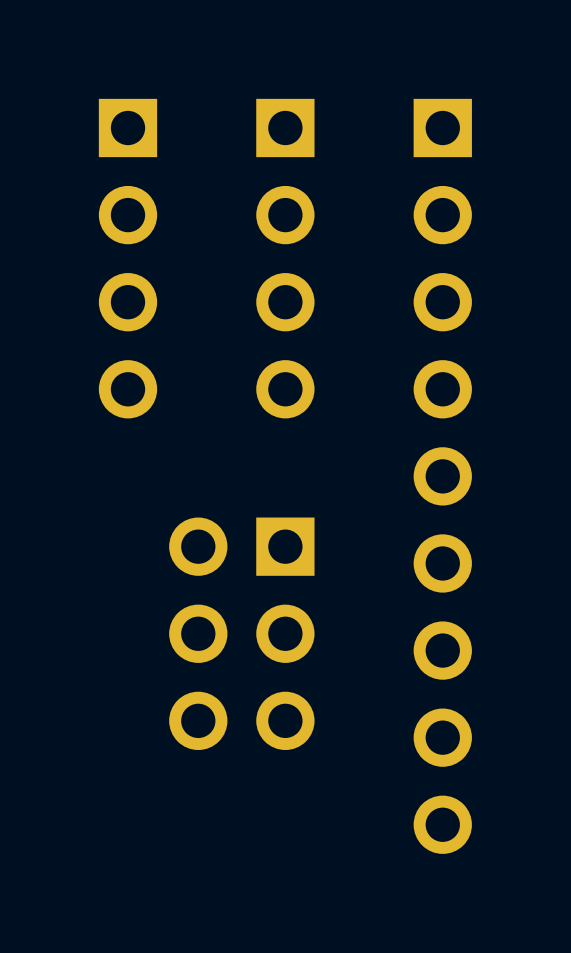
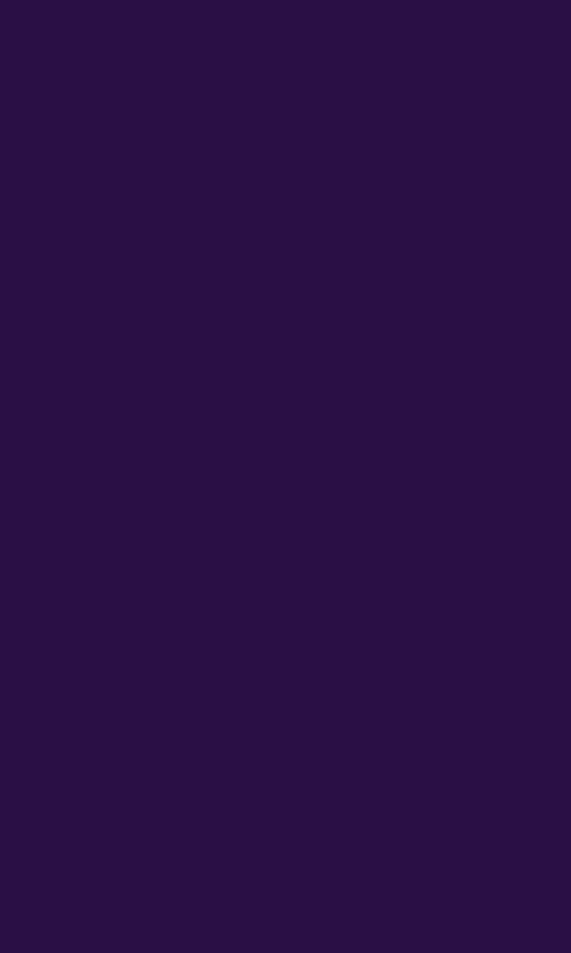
part: (127, 258) -> none
part: (285, 258) -> none
part: (442, 476) -> none
part: (241, 633) -> none

